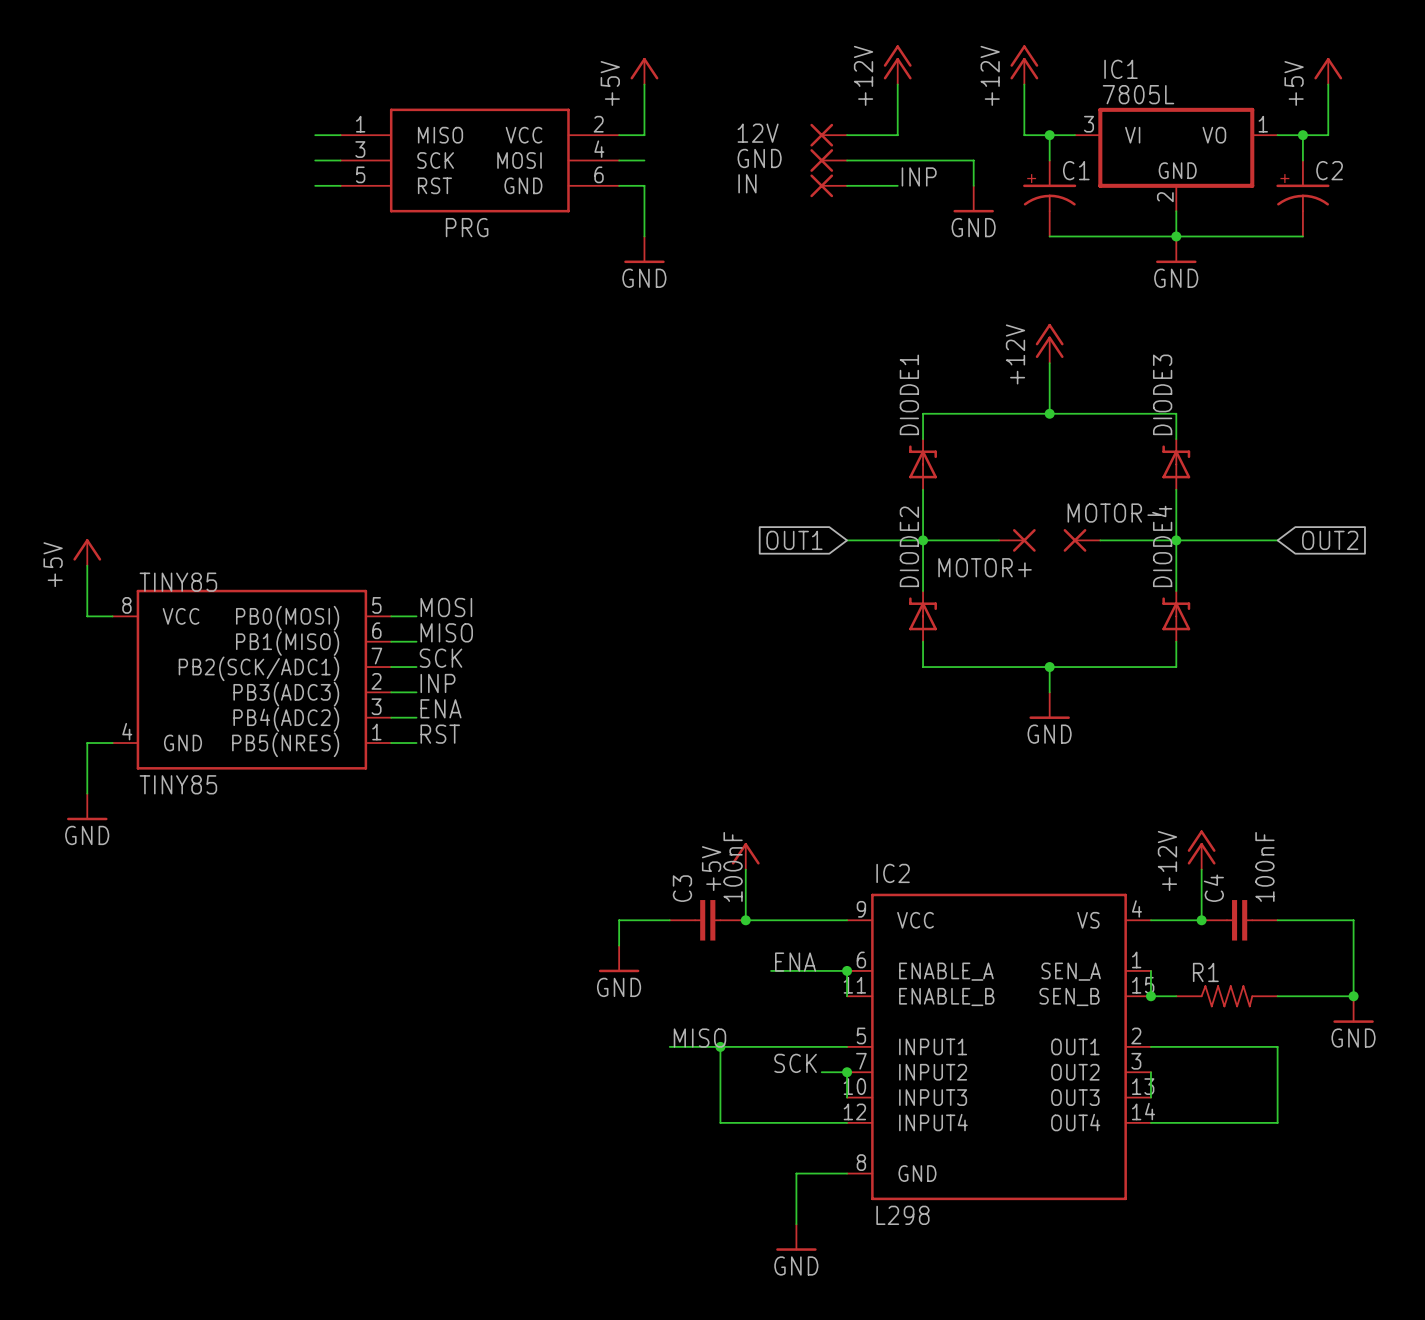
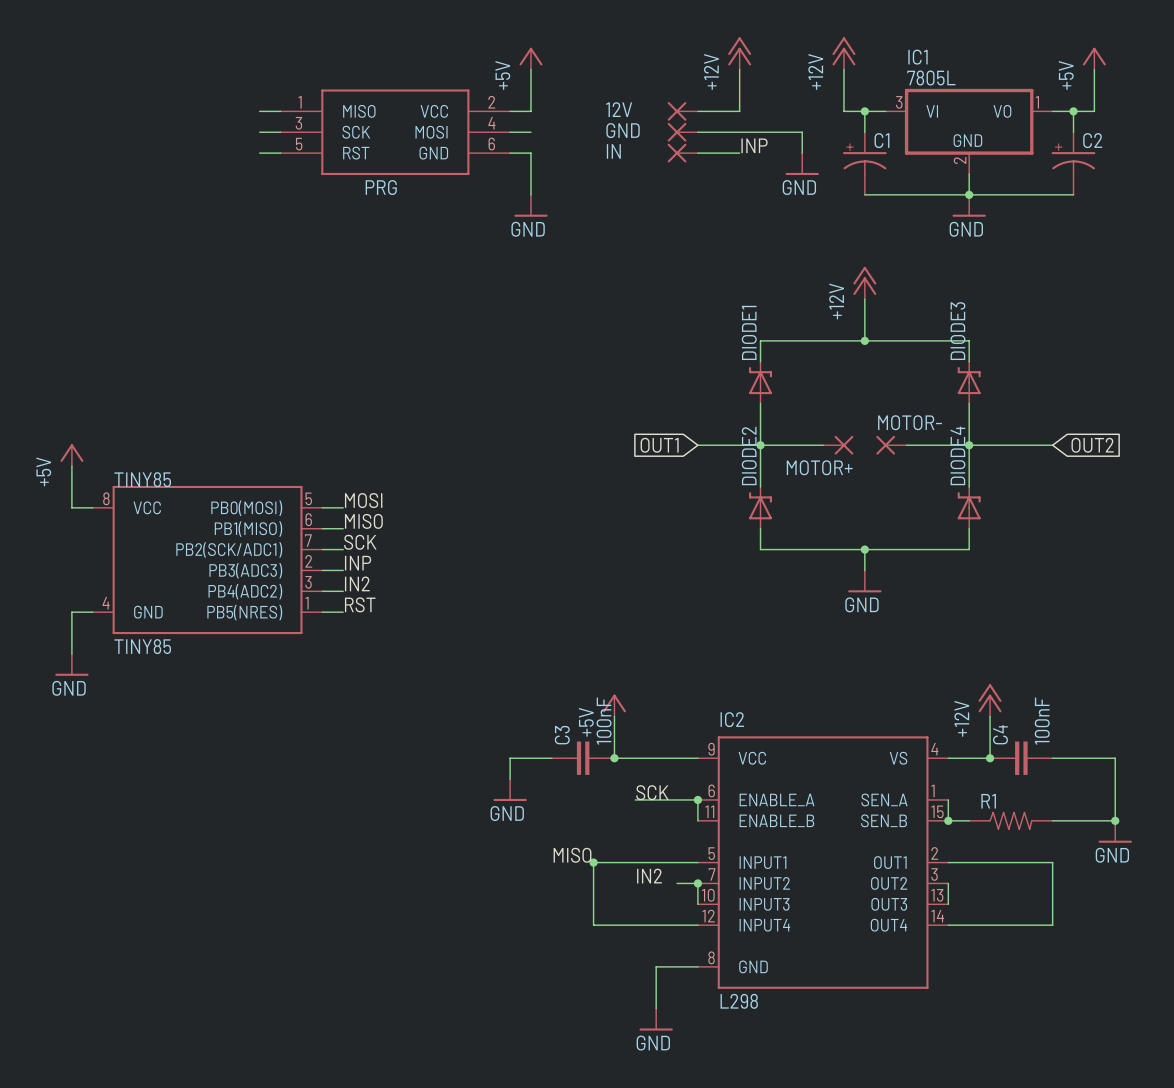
label: ENA (441, 708) -> IN2 (357, 583)
label: ENA (795, 962) -> SCK (652, 792)
wire: (669, 1046) (720, 1046) -> none
label: SCK (795, 1063) -> IN2 (649, 876)

